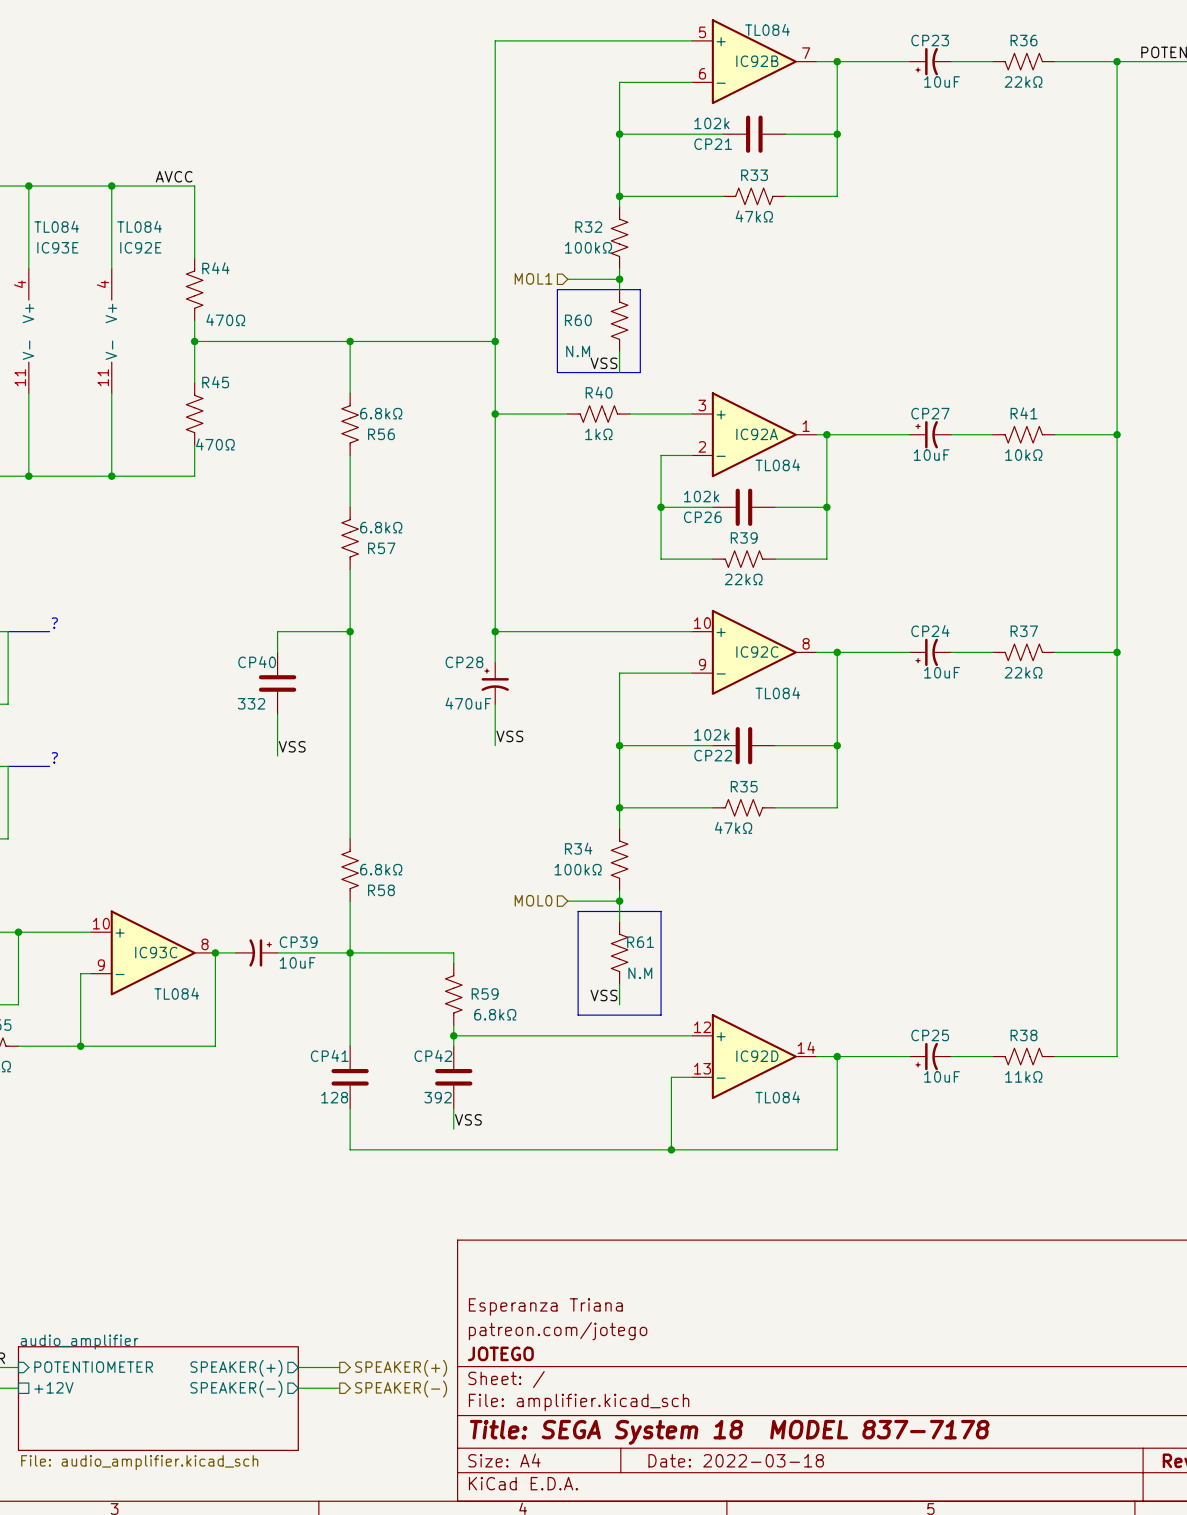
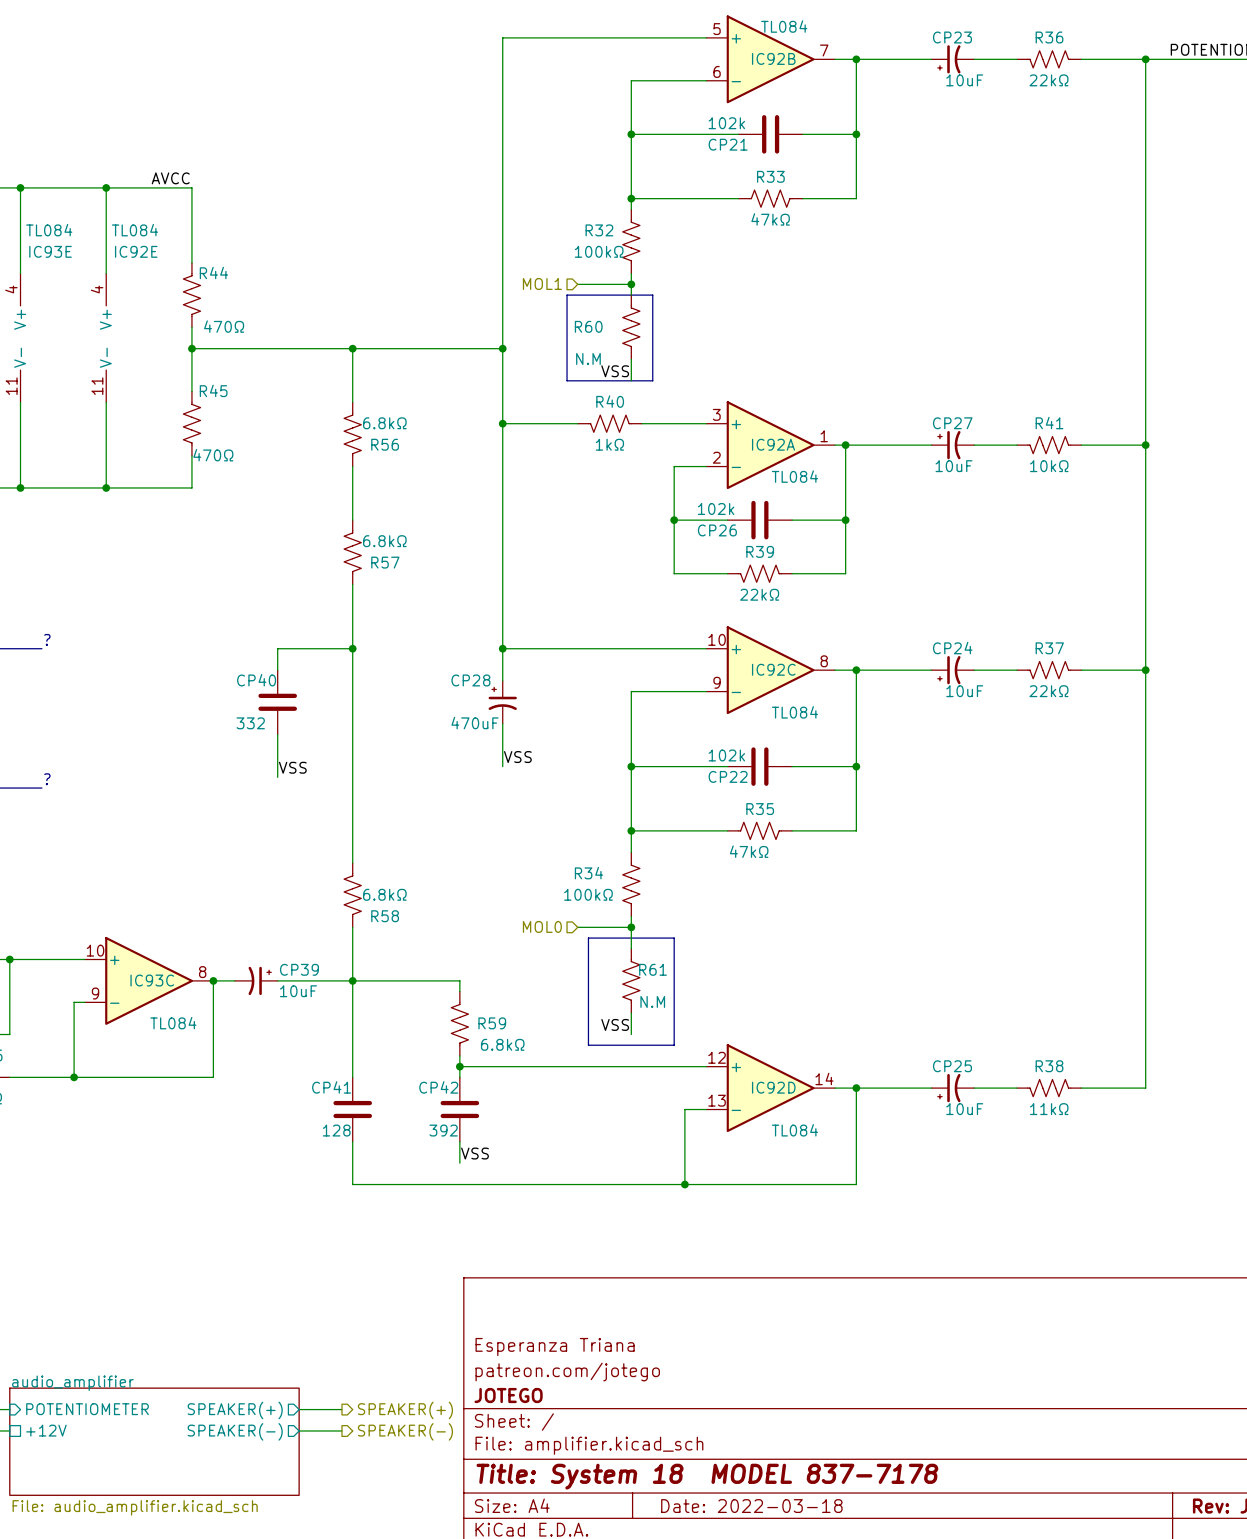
title block: Title: SEGA System 18 MODEL 837-7178 (729, 1432) -> Title: System 18 MODEL 837-7178 (707, 1476)

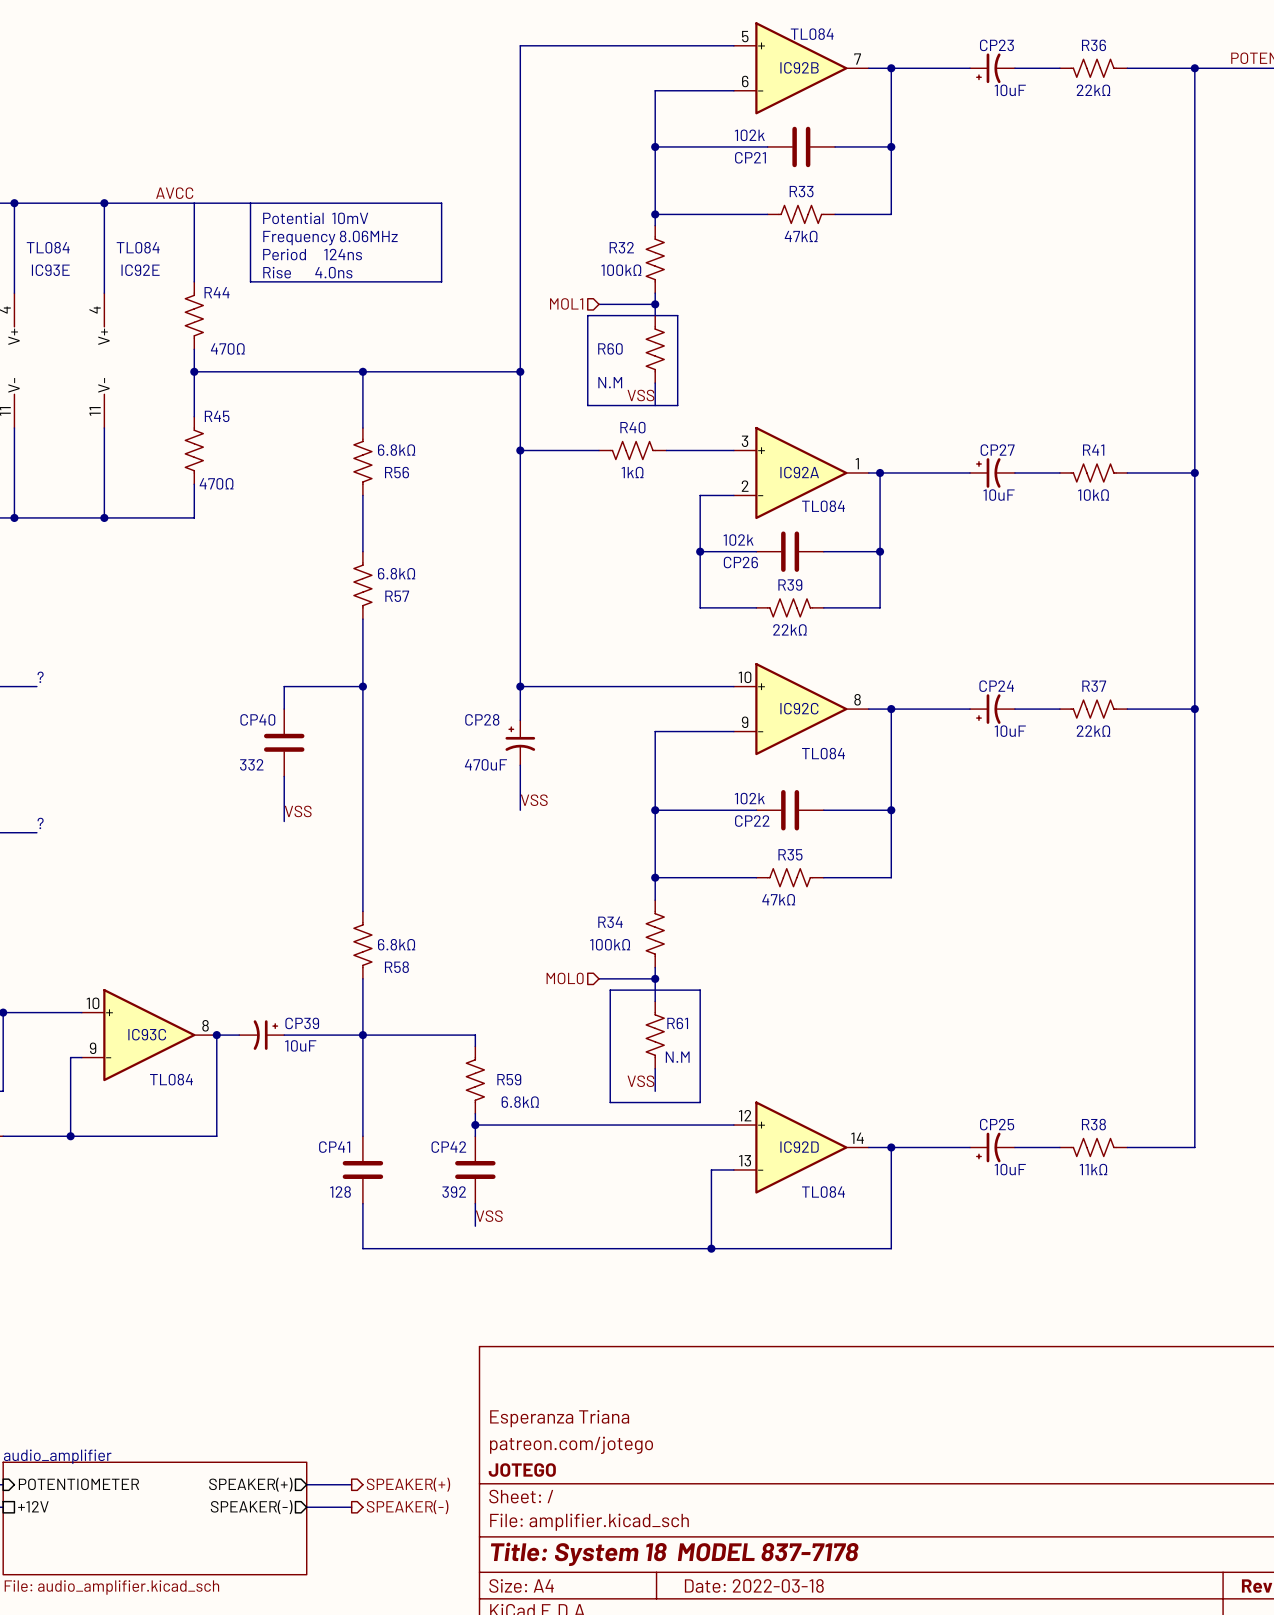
line: none -> (194, 203) (441, 203) (441, 281) (250, 281) (250, 203)
text: none -> Potential 10mV (315, 218)
text: none -> Frequency 8.06MHz (330, 237)
text: none -> Period 124ns (312, 254)
text: none -> Rise 4.0ns (307, 272)

